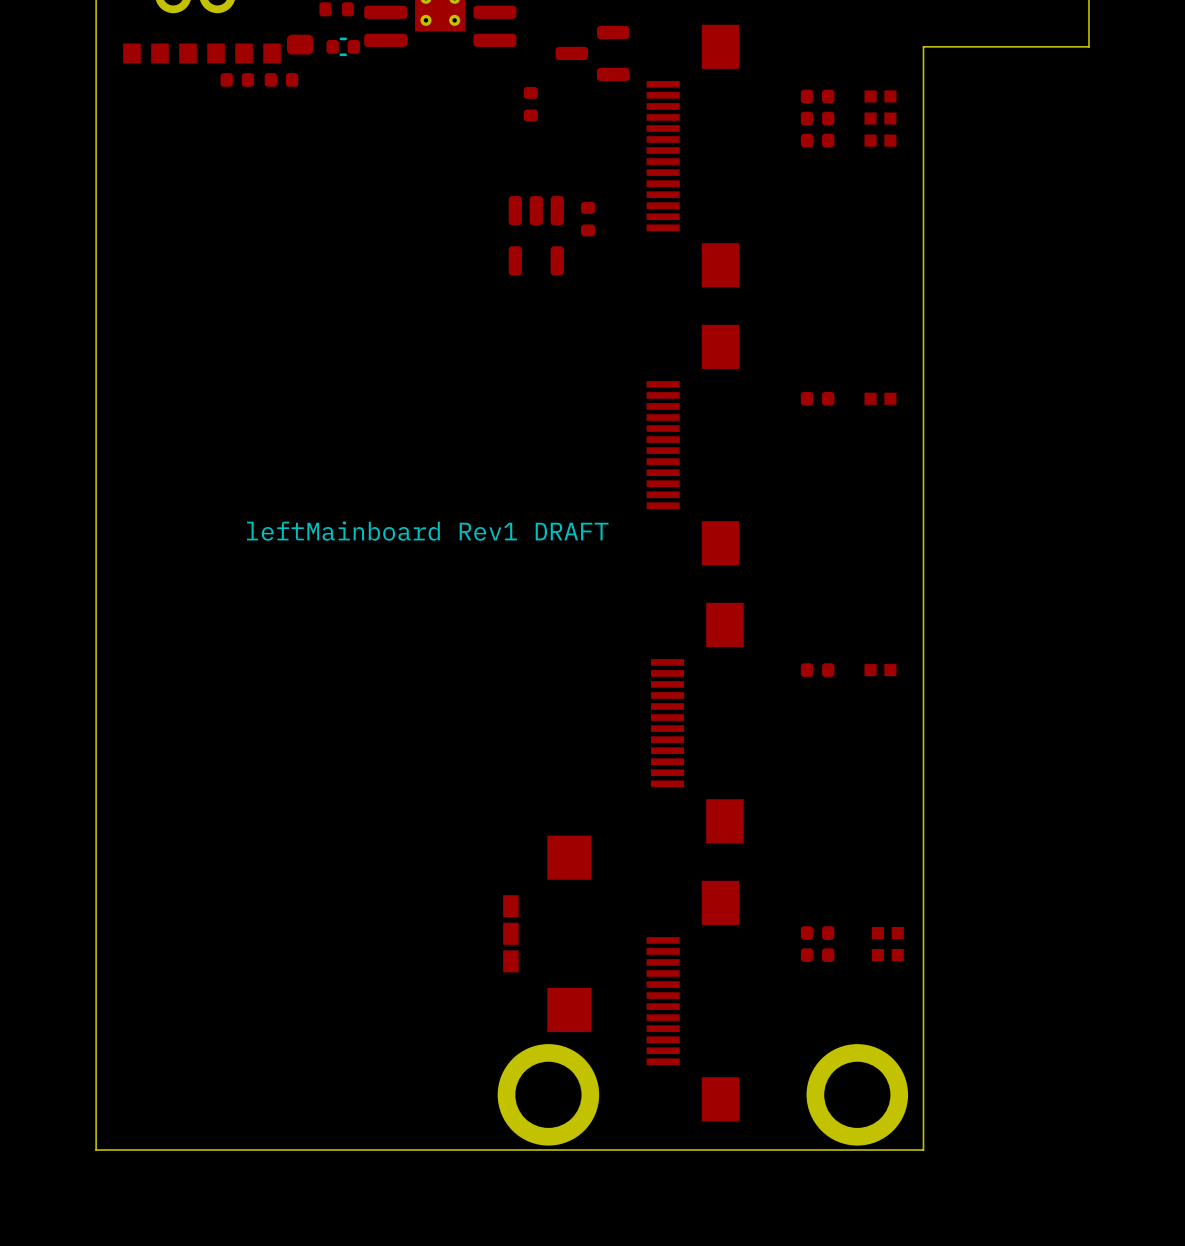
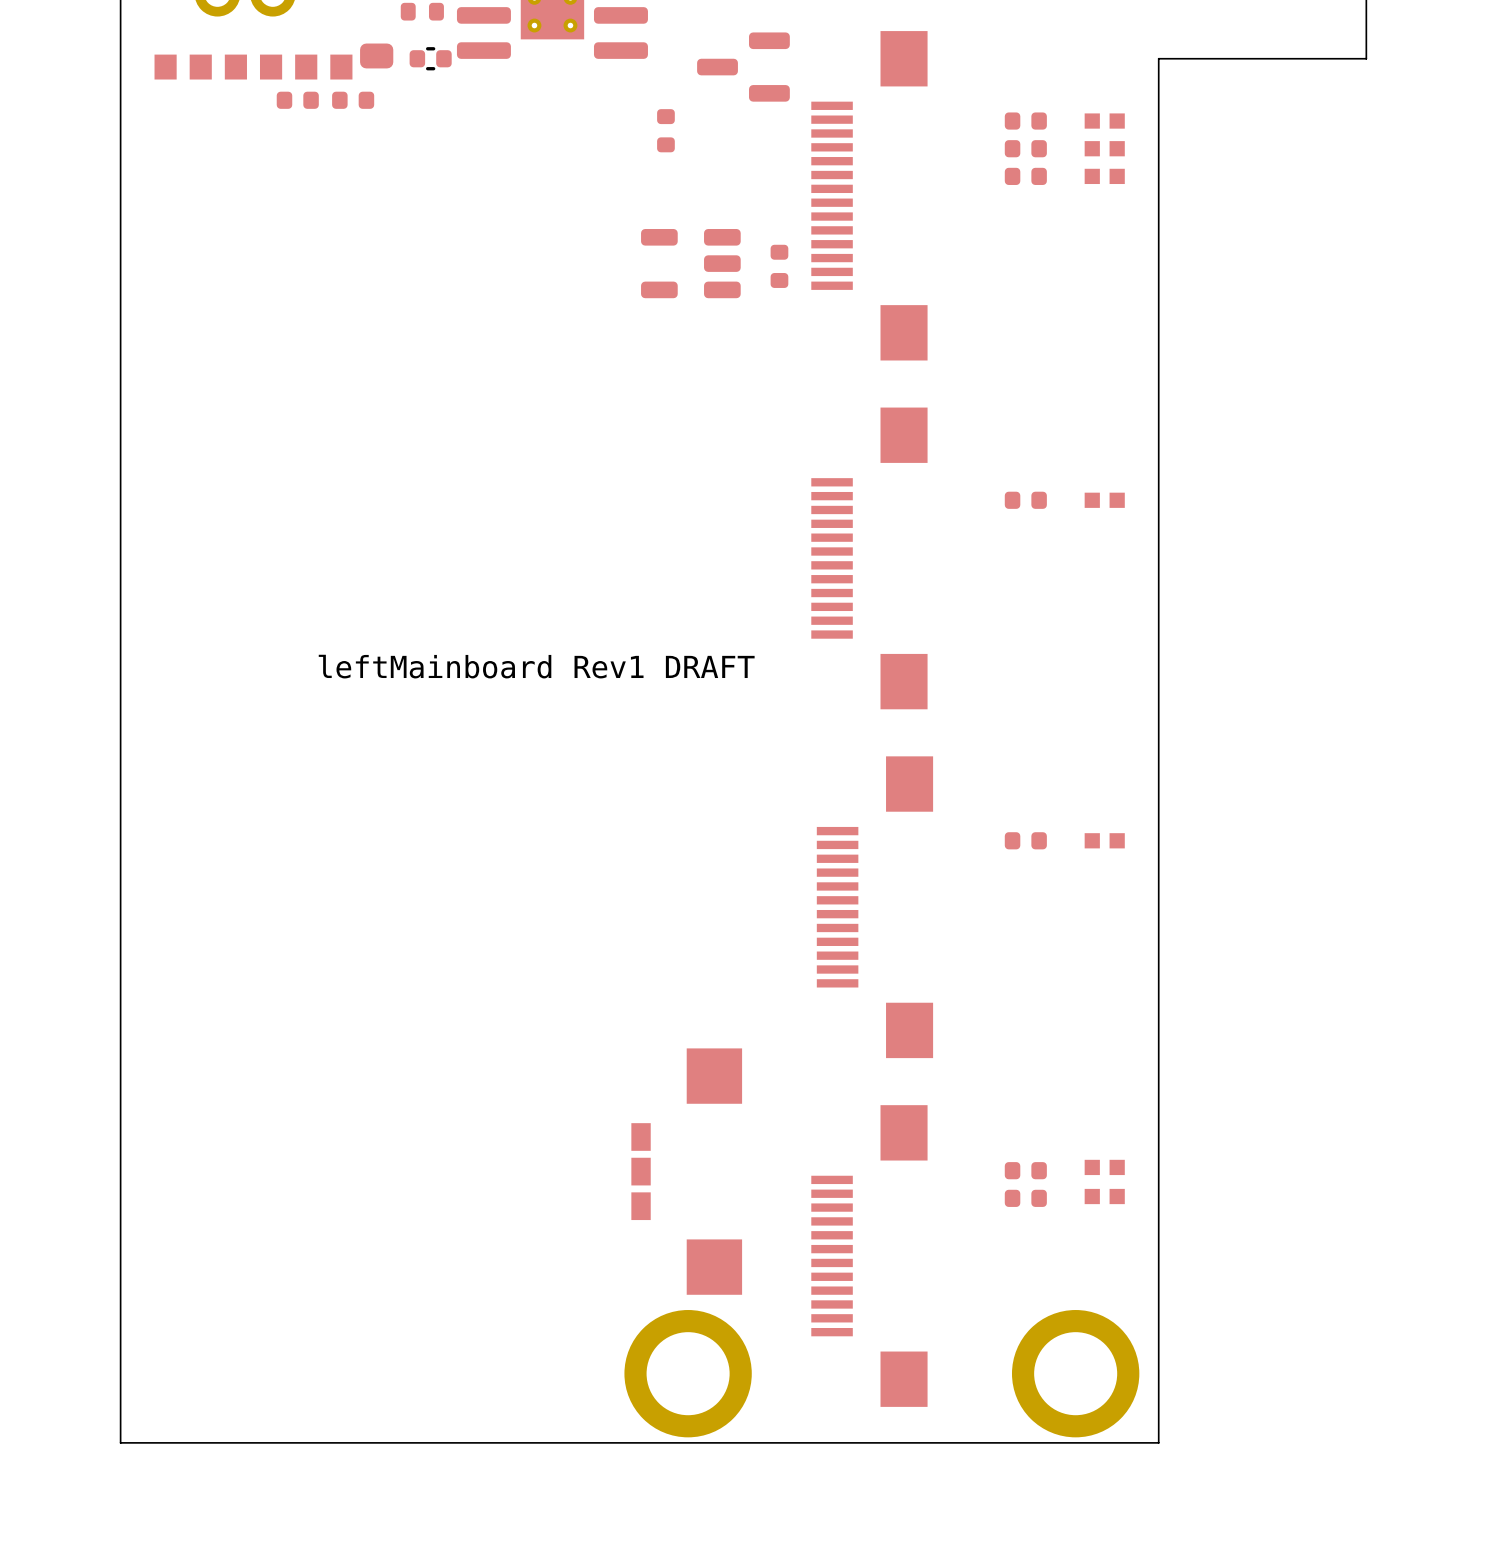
part position: (588, 219) -> (779, 266)
part rotation: 0° (536, 235) -> 90° clockwise (690, 263)
part: none -> (1092, 1167)
part: none -> (1117, 1167)
part: (877, 933) -> none
part: (897, 933) -> none
part: none -> (1092, 1196)
part: none -> (1117, 1196)
part: (877, 955) -> none
part: (897, 955) -> none

